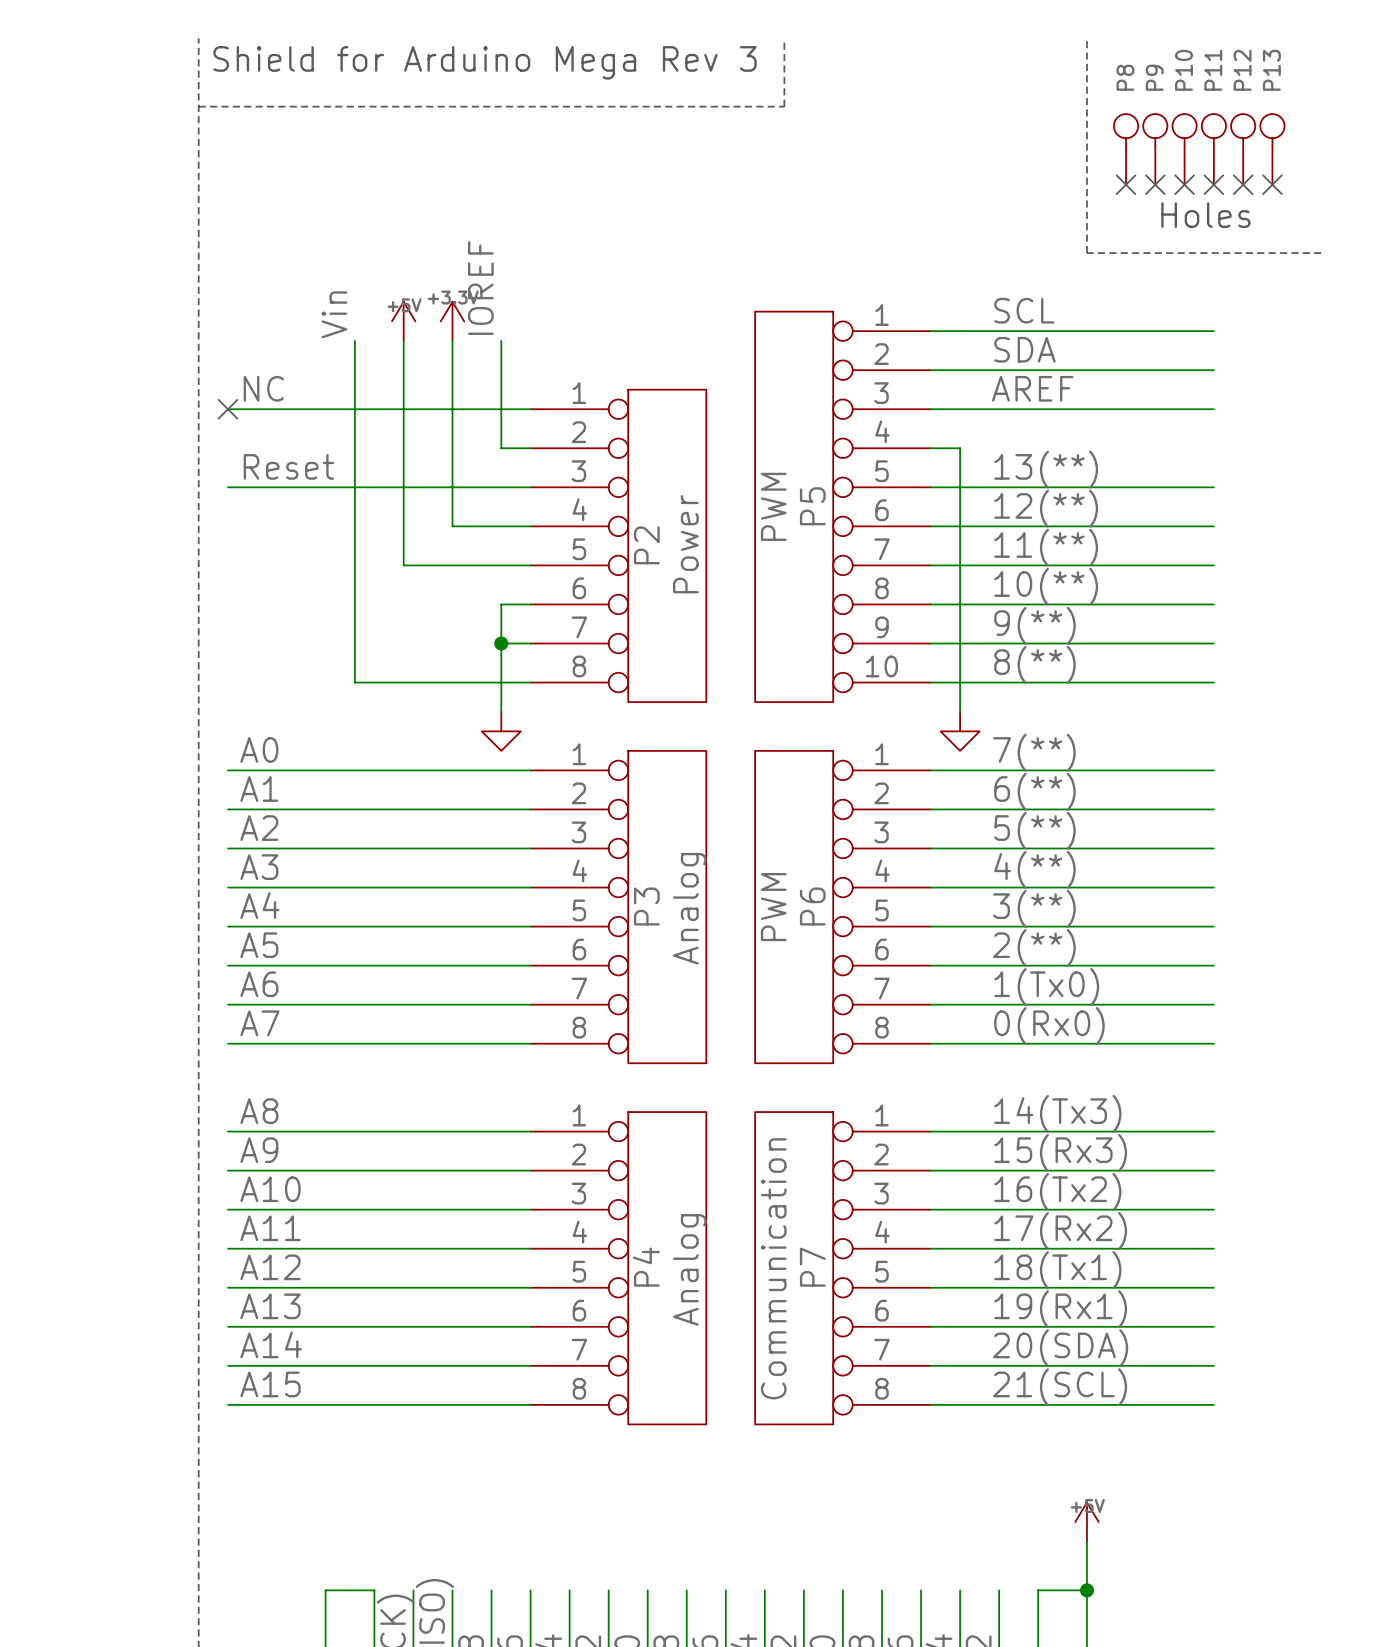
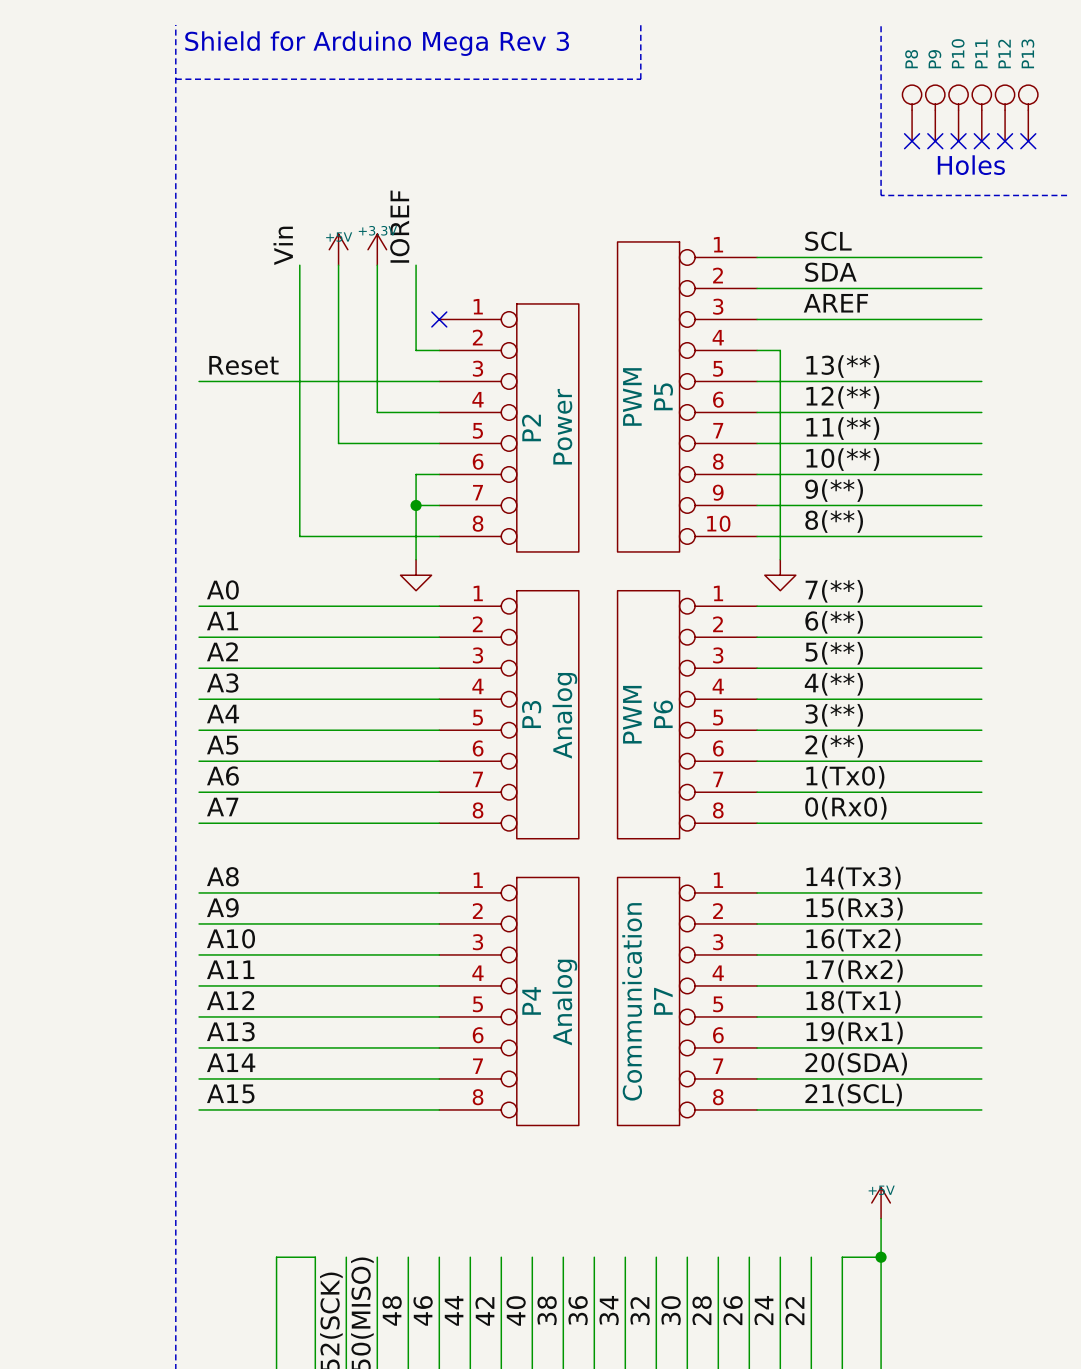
label: NC (263, 388) -> none
wire: (227, 409) (530, 409) -> none
no-connect mark: (227, 409) -> none
no-connect mark: none -> (439, 319)

